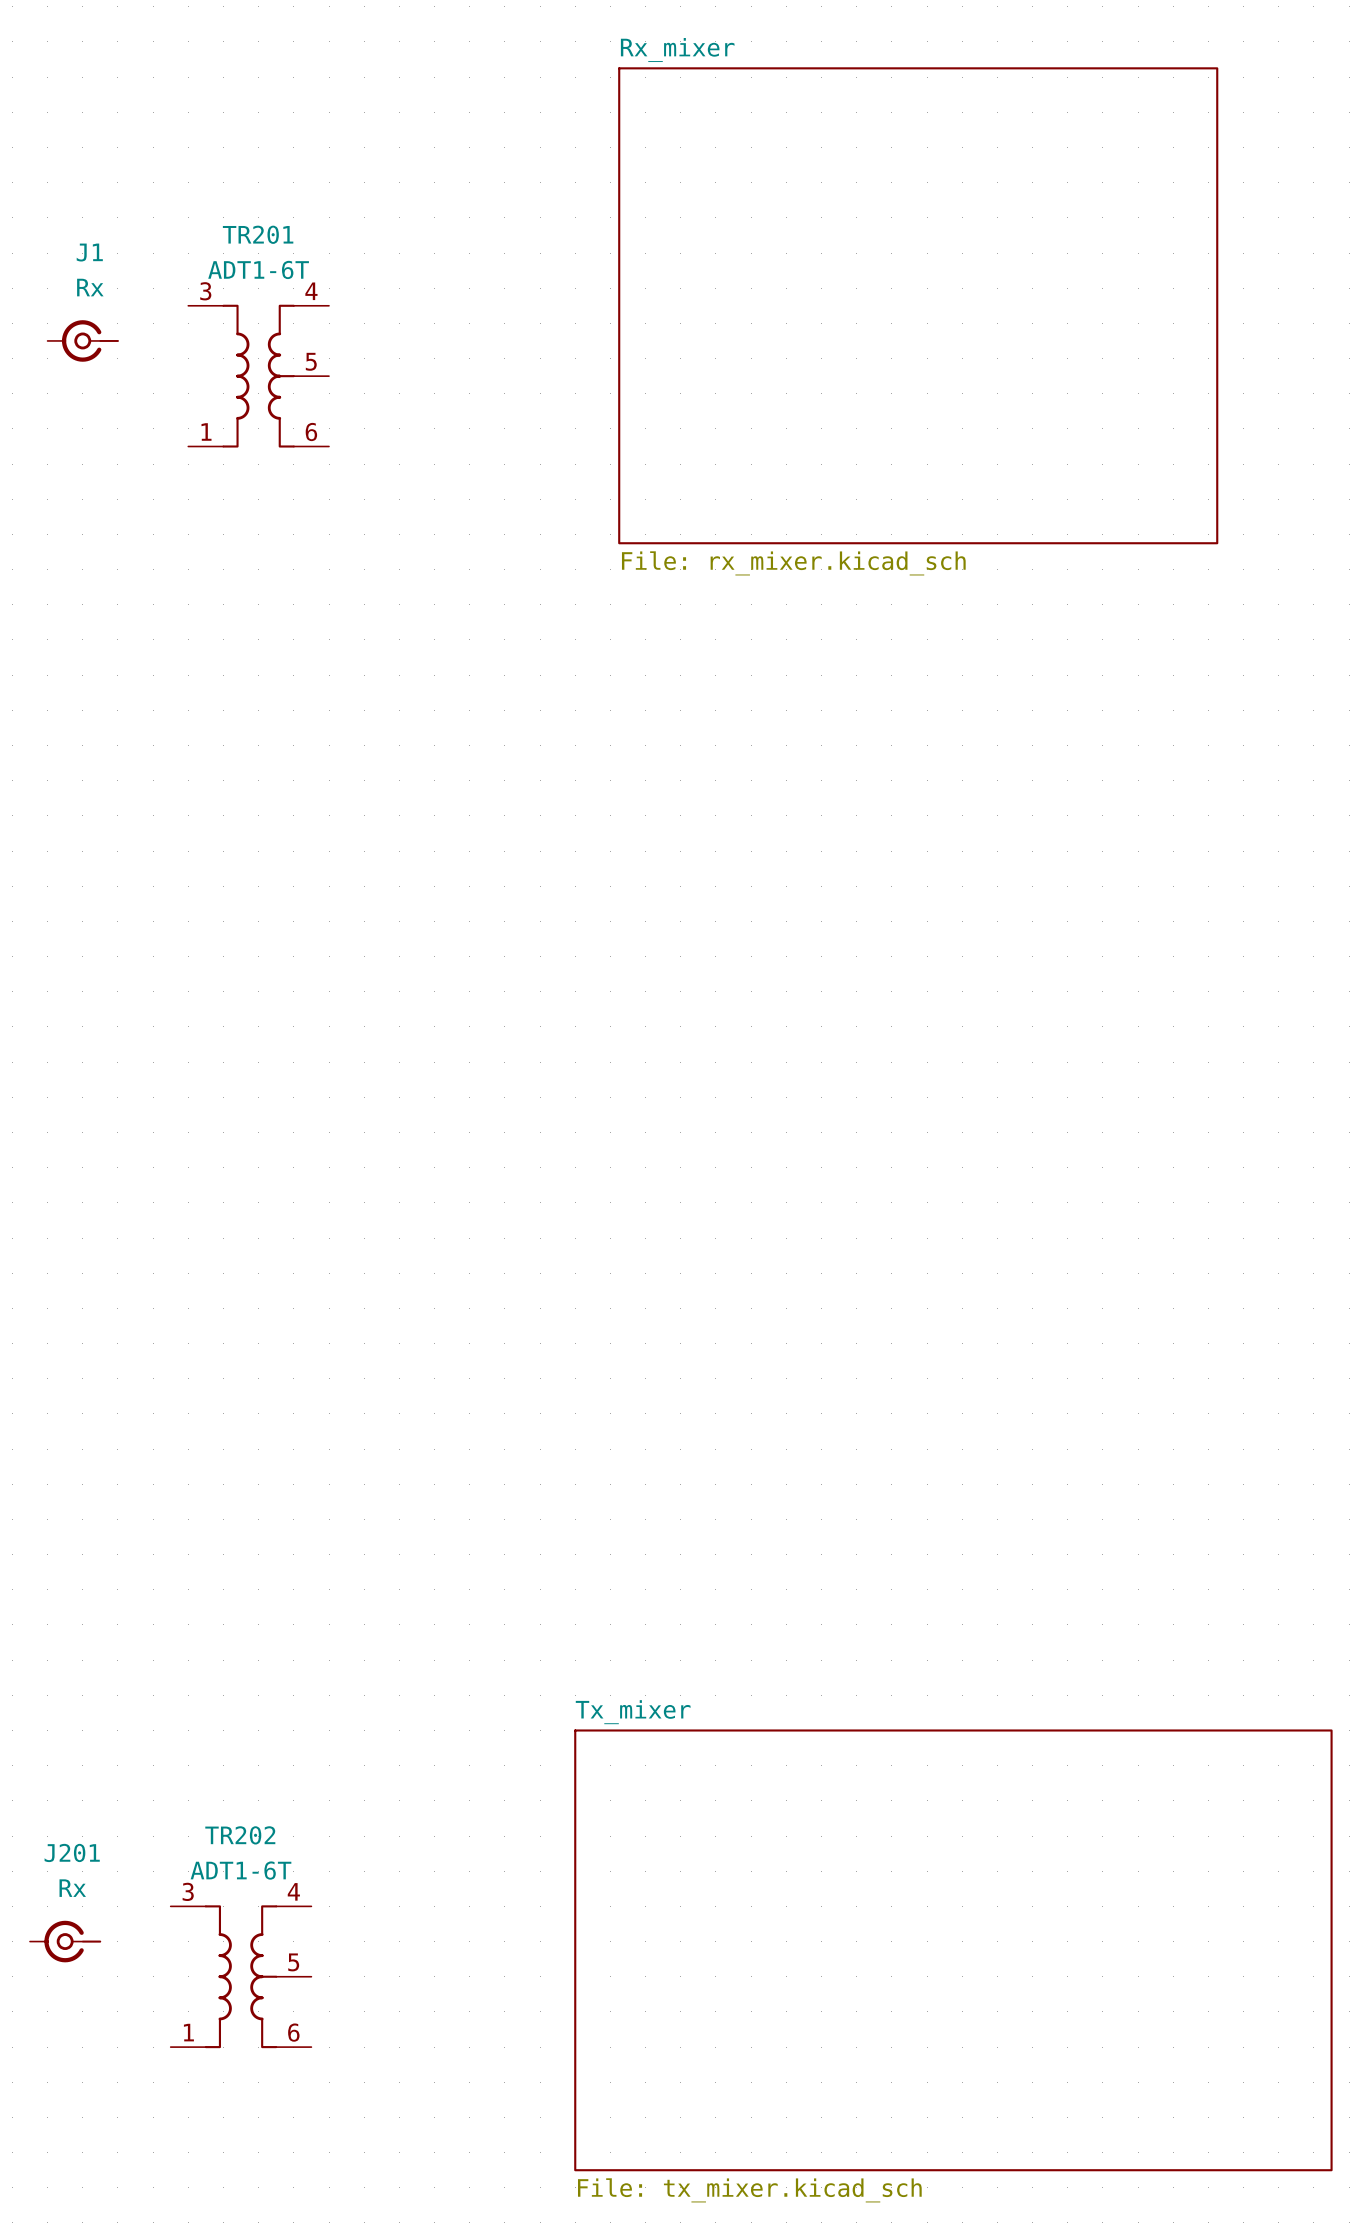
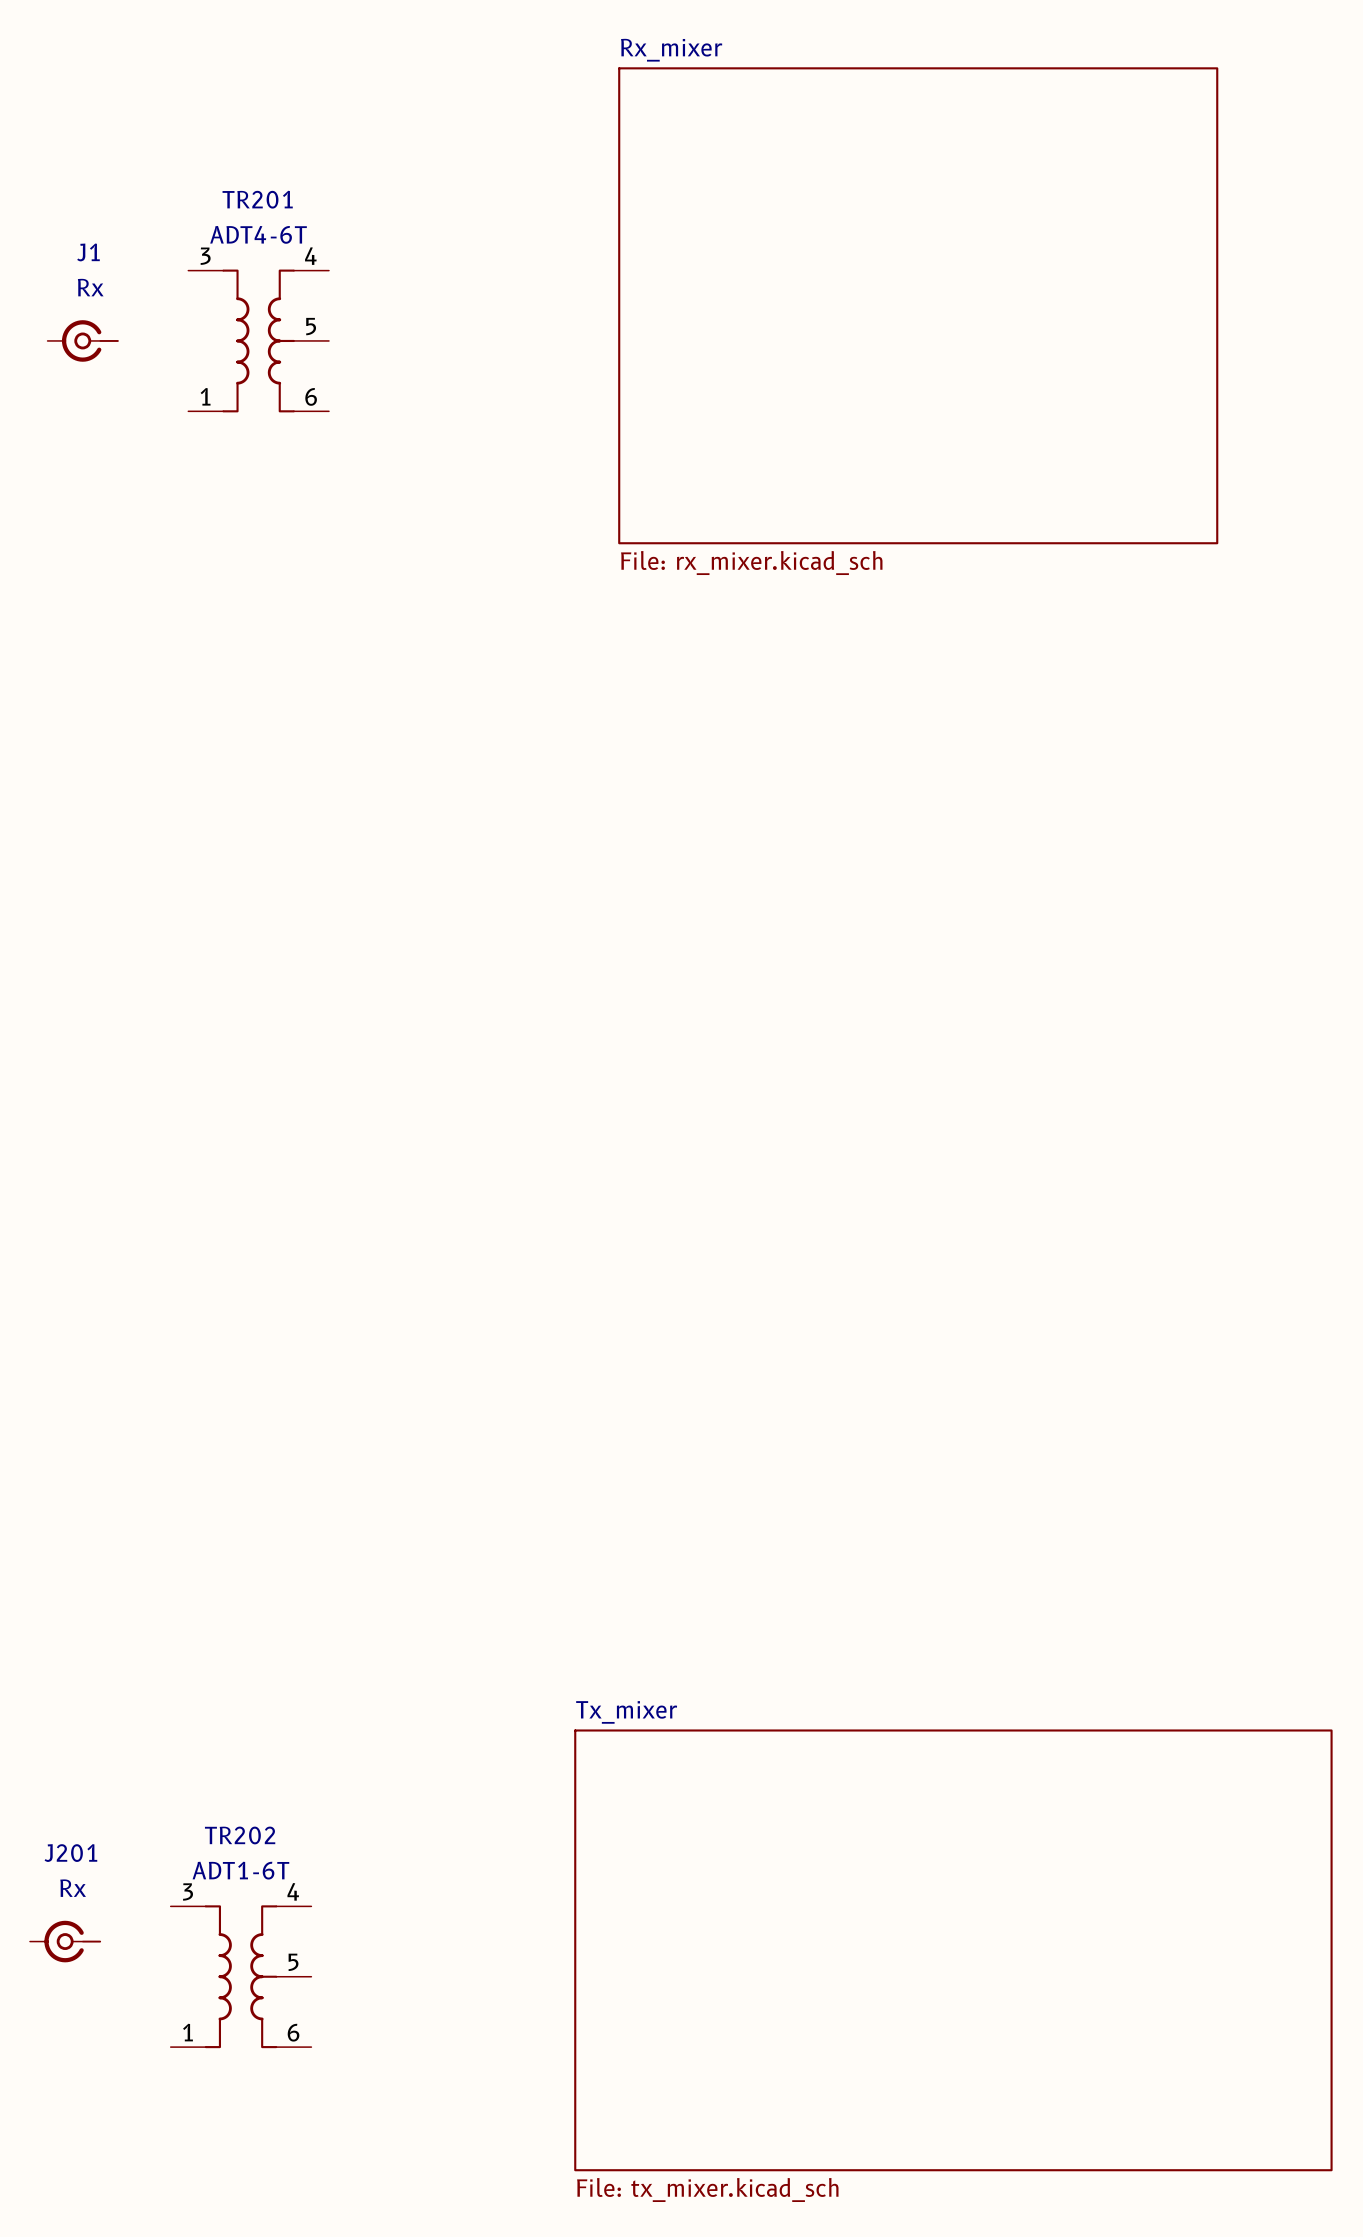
TR201 value: ADT1-6T (258, 269) -> ADT4-6T (258, 234)
TR201 position: (258, 376) -> (258, 340)

